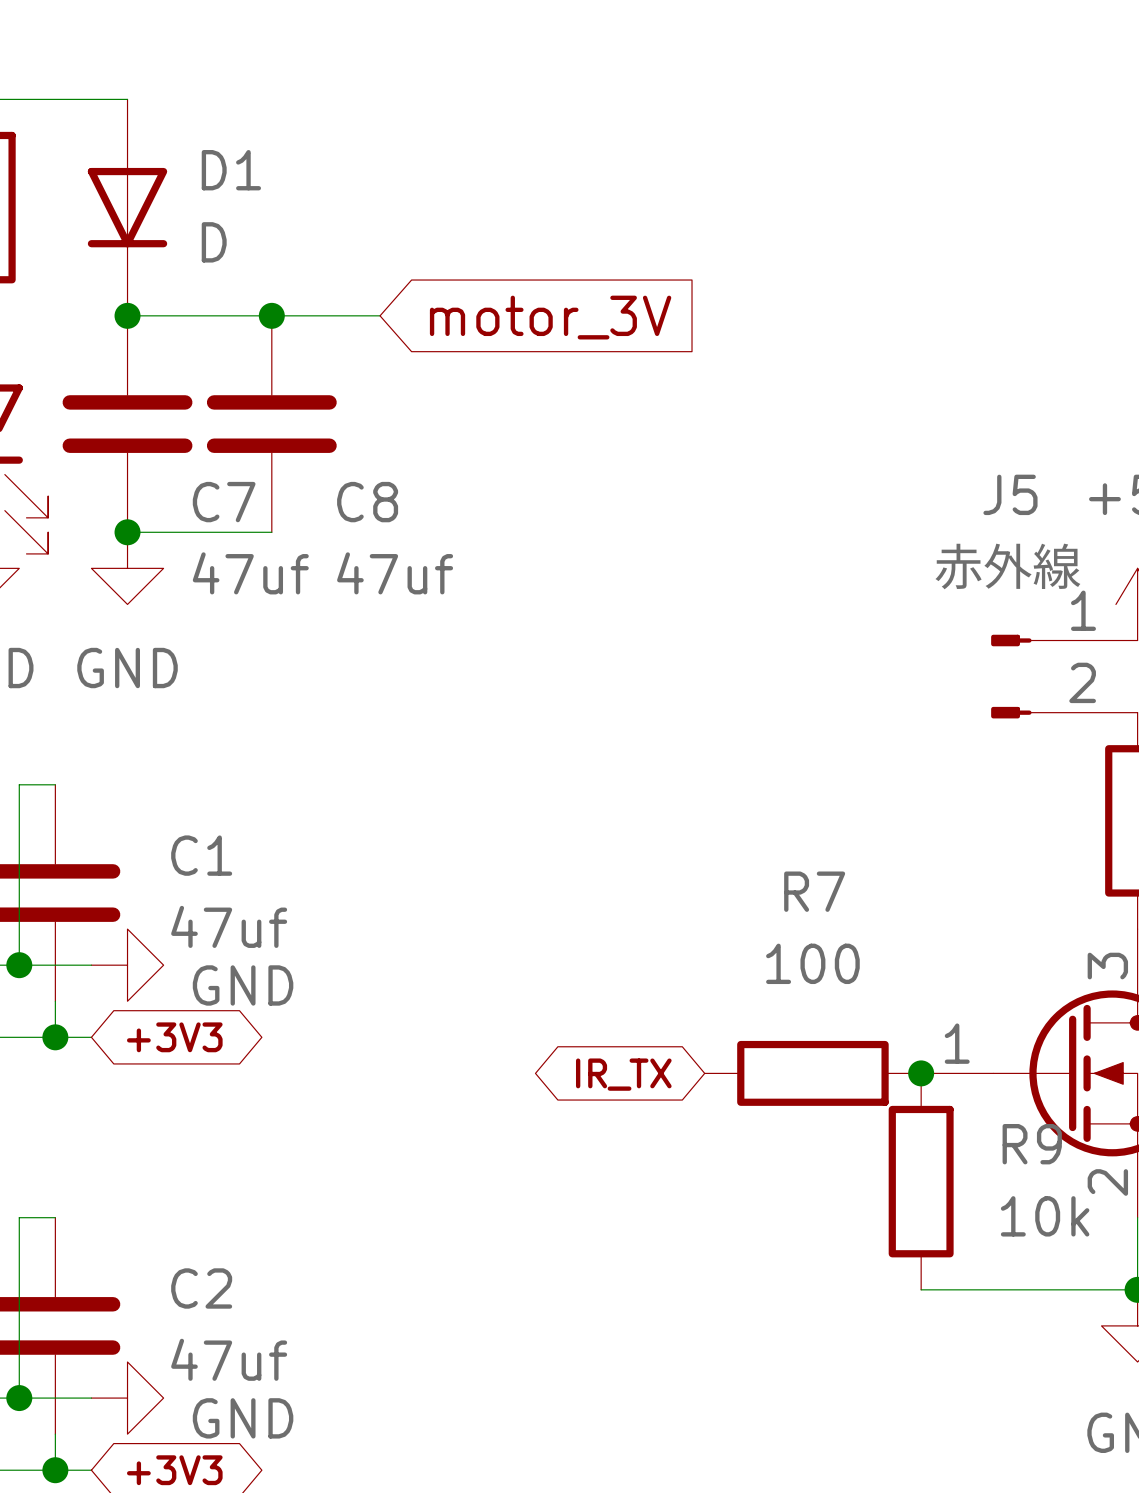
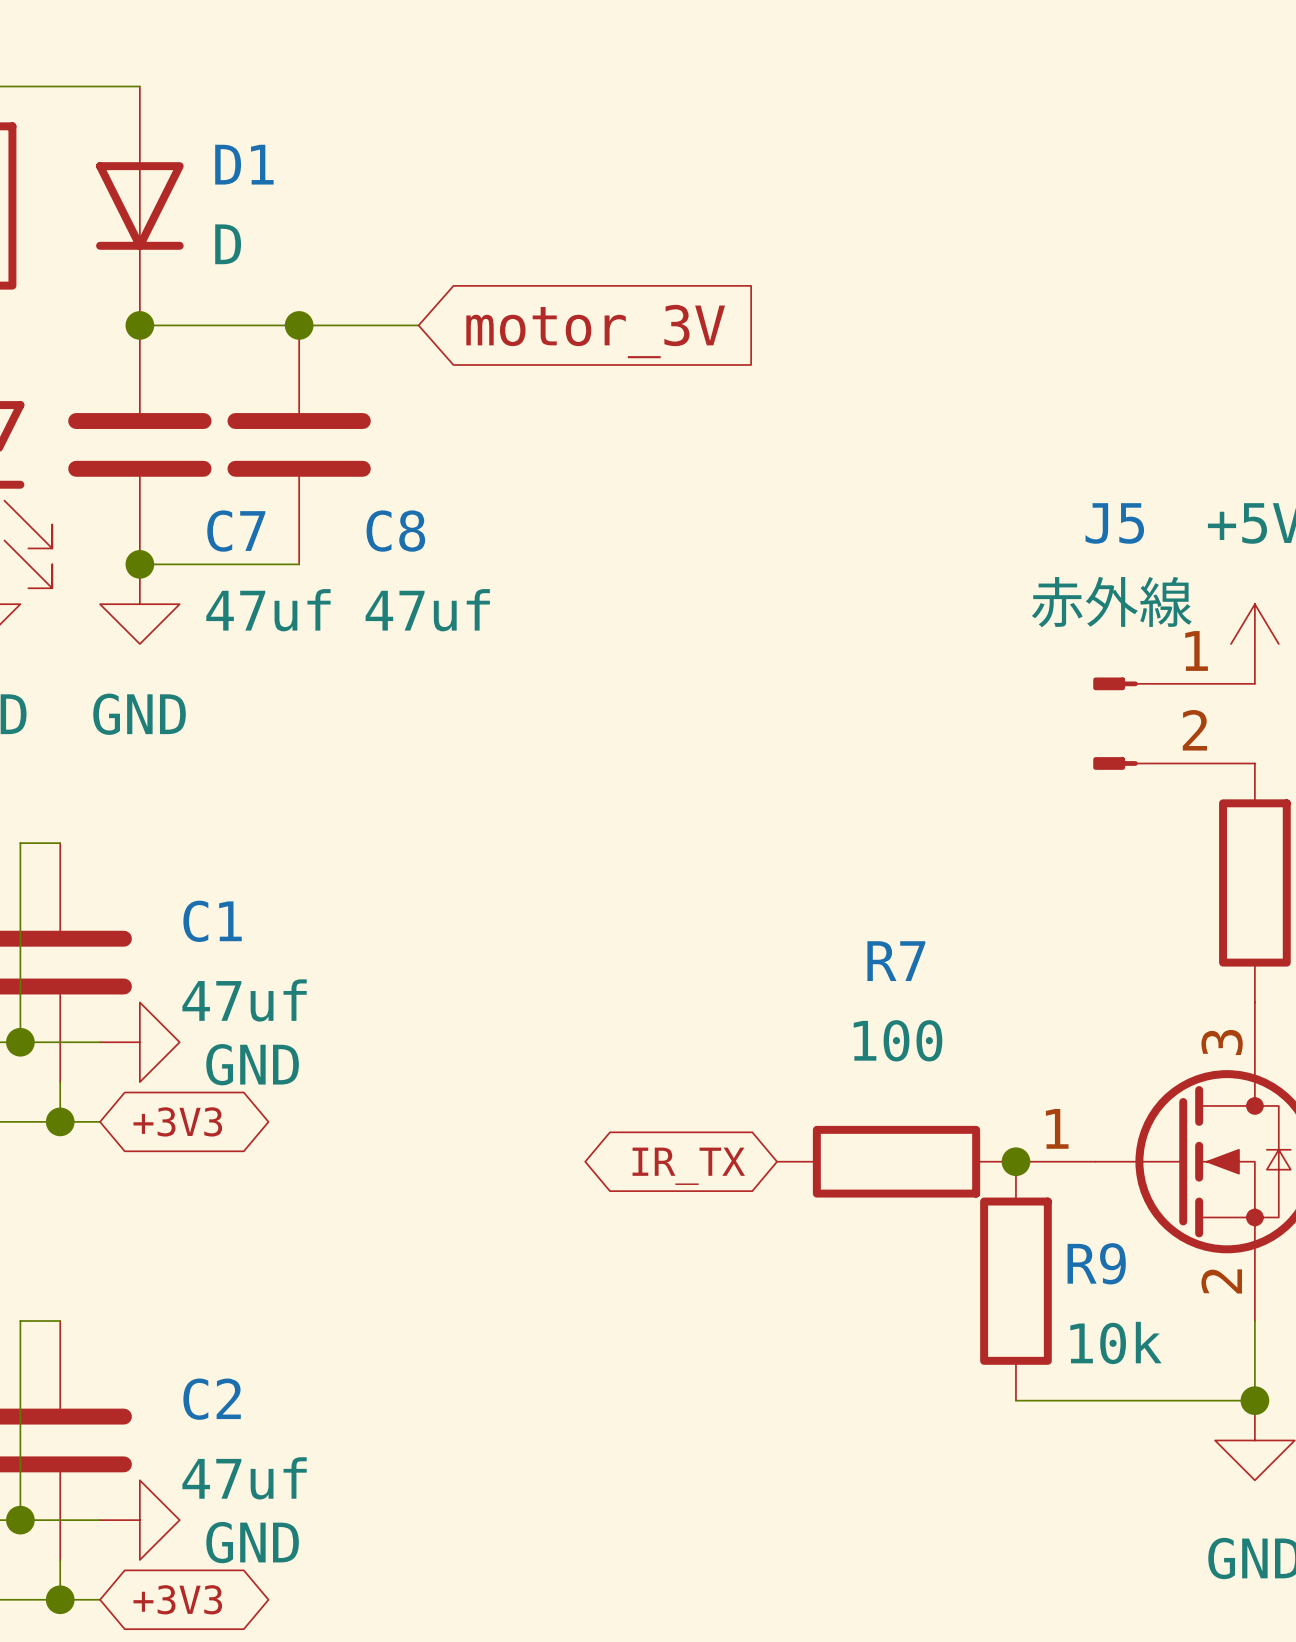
R9 name position: R9 (1032, 1144) -> R9 (1096, 1263)
R9 value position: 10k (1045, 1216) -> 10k (1115, 1342)

